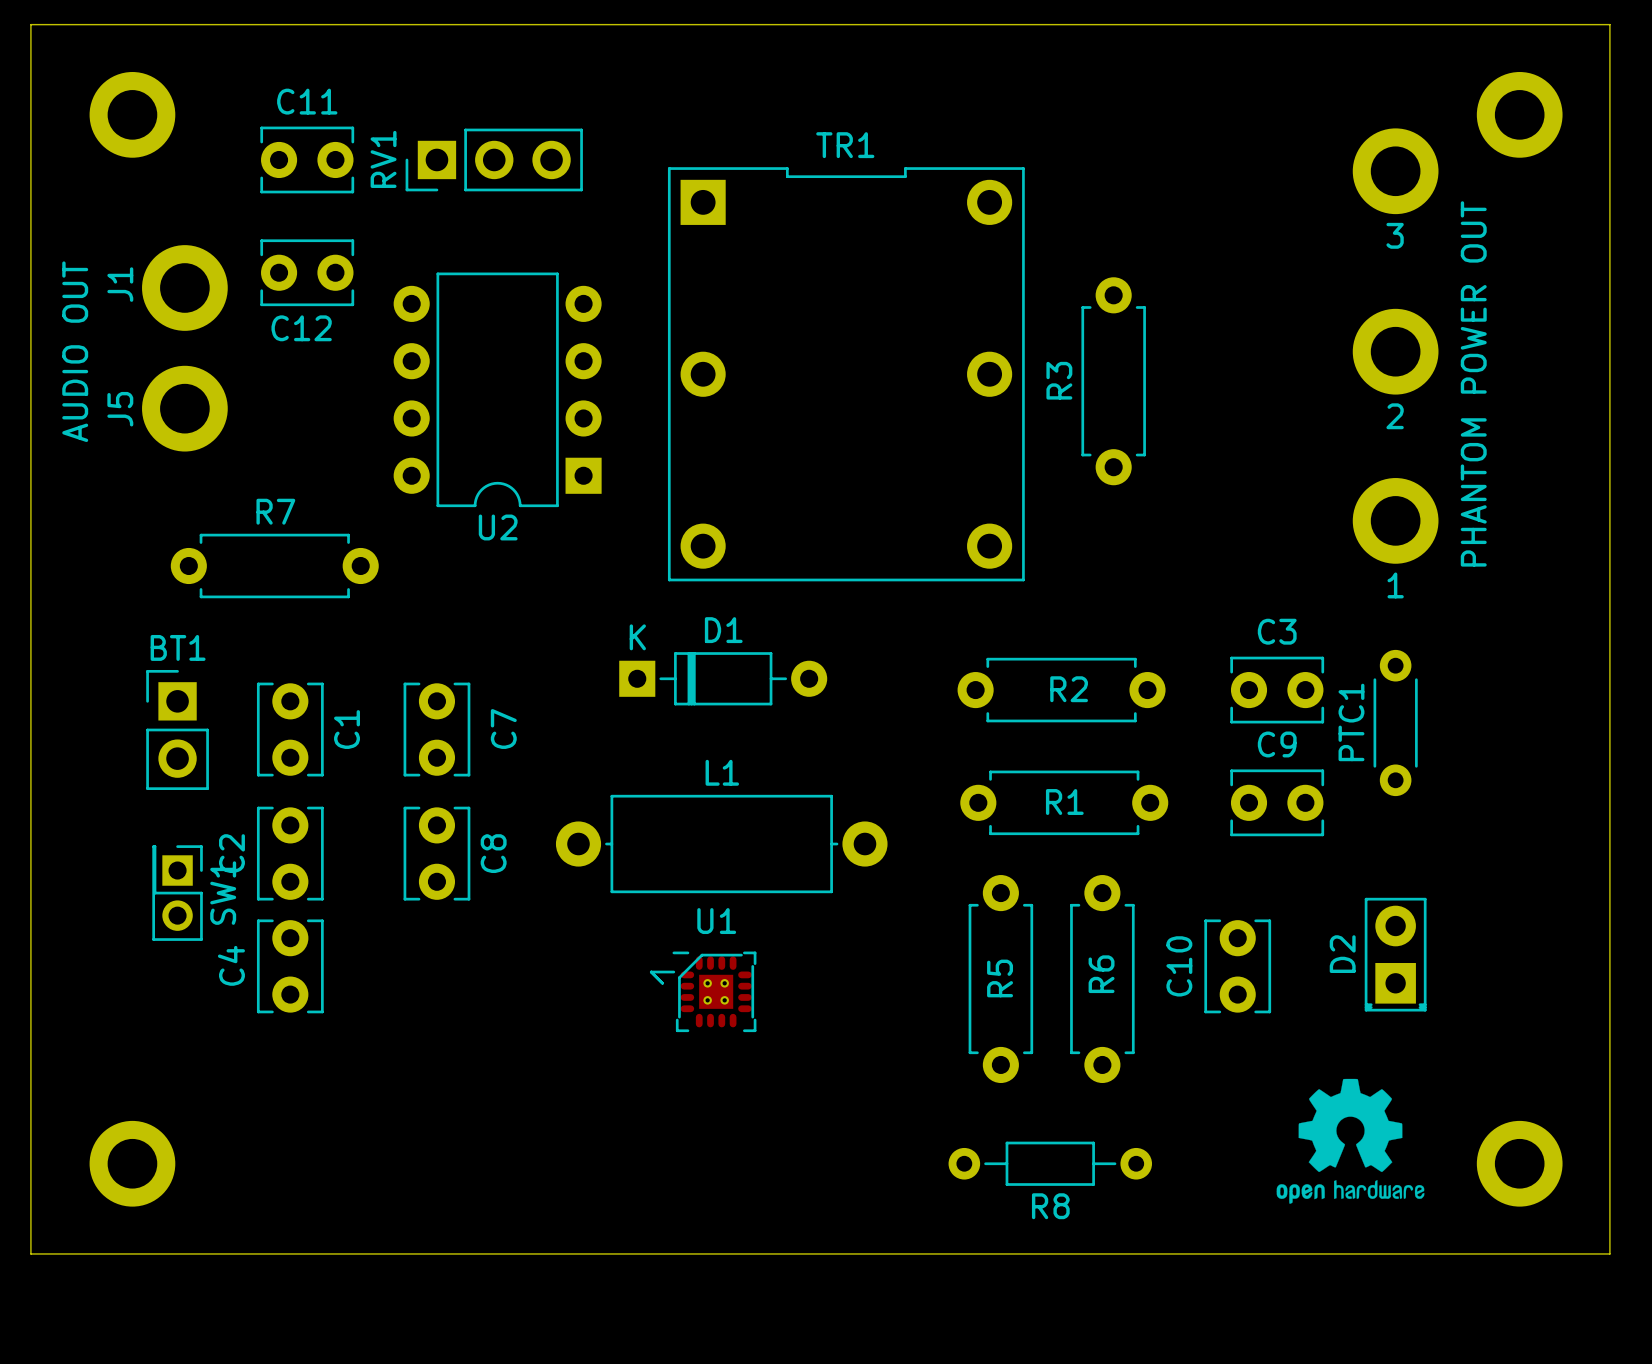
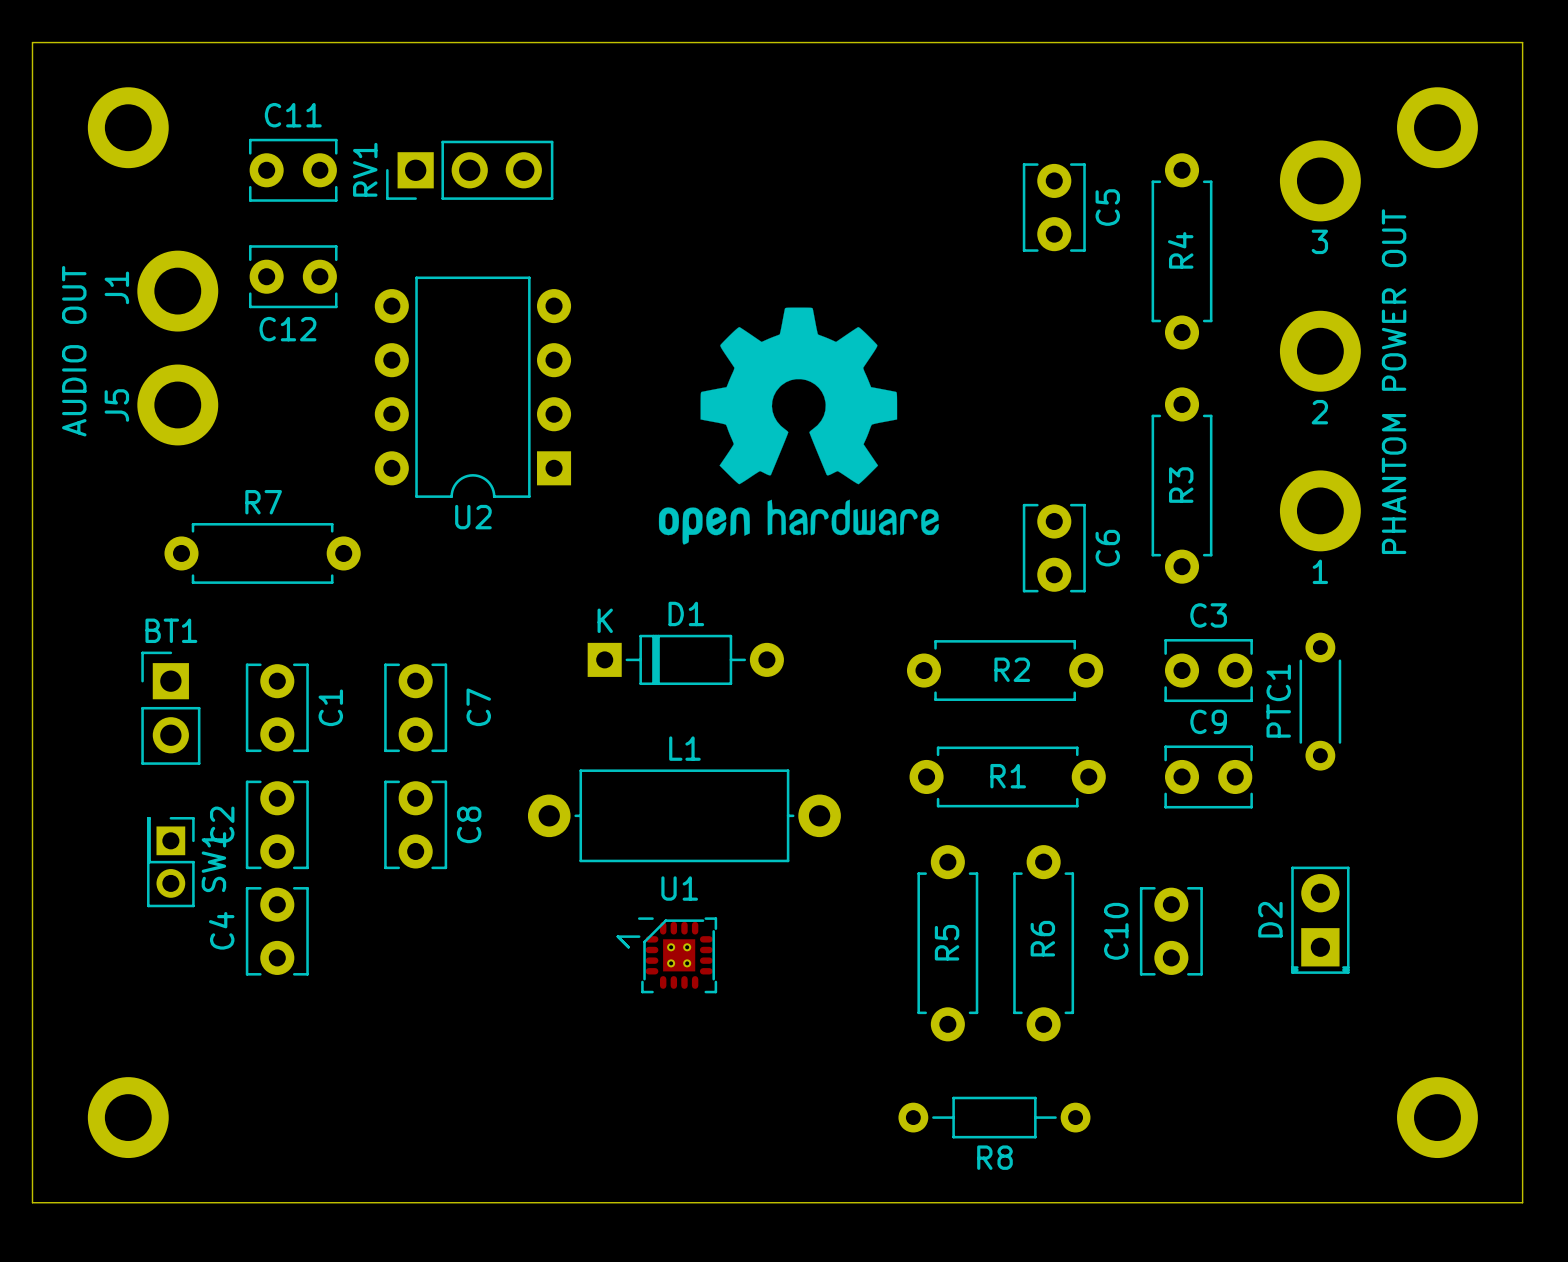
C5: none -> (1054, 207)
R4: none -> (1182, 251)
drawing: none -> [658, 307, 939, 545]
TR1: (846, 374) -> none
R3 name position: R3 (1059, 380) -> R3 (1181, 485)
R3 position: (1113, 381) -> (1182, 485)
C6: none -> (1054, 548)
drawing: [1276, 1078, 1425, 1204] -> none

